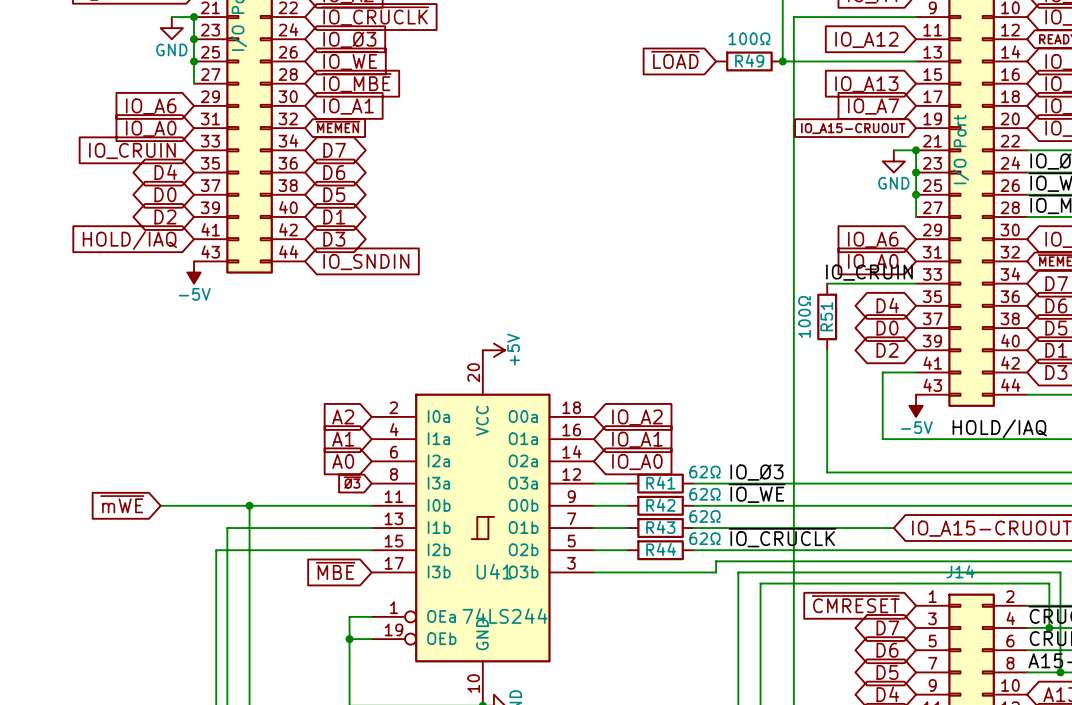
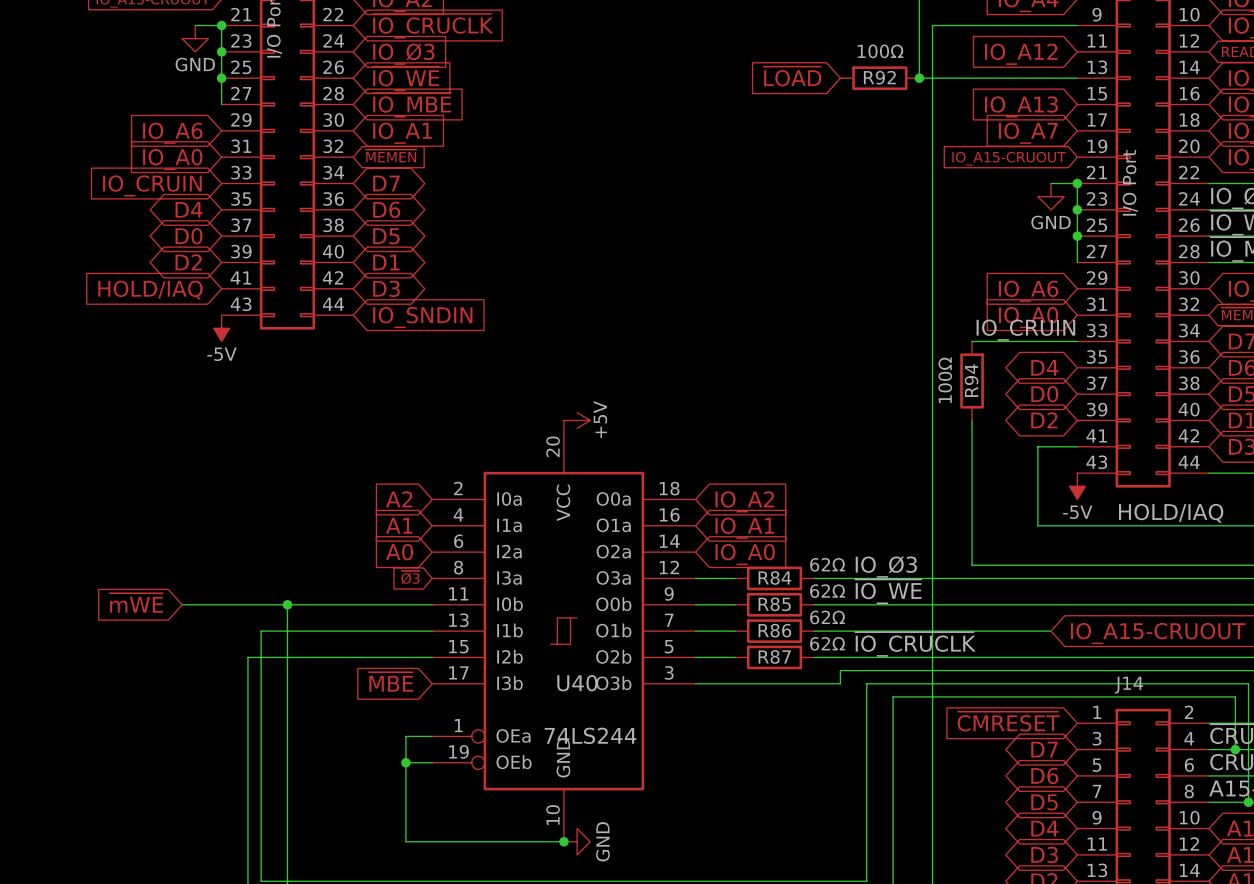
R49 name: R49 (749, 60) -> R92 (879, 77)
R51 name: R51 (826, 316) -> R94 (971, 380)
R41 name: R41 (660, 482) -> R84 (774, 577)
R42 name: R42 (660, 505) -> R85 (774, 604)
R43 name: R43 (660, 527) -> R86 (774, 630)
R44 name: R44 (661, 549) -> R87 (774, 656)
U41 name: U41 (494, 571) -> U40 (577, 683)

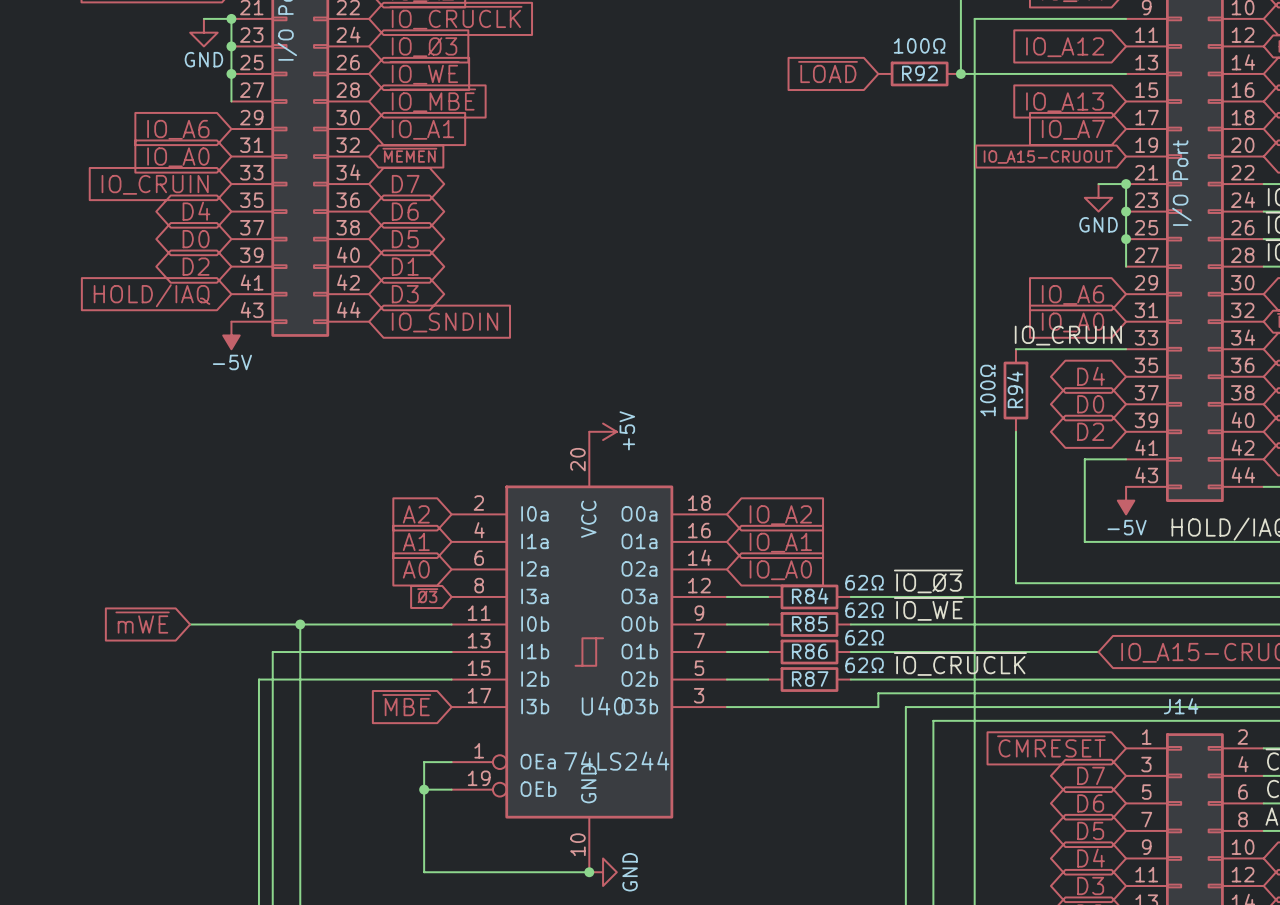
label: IO_Ø3 (886, 566) -> ~{IO_Ø3} (928, 581)

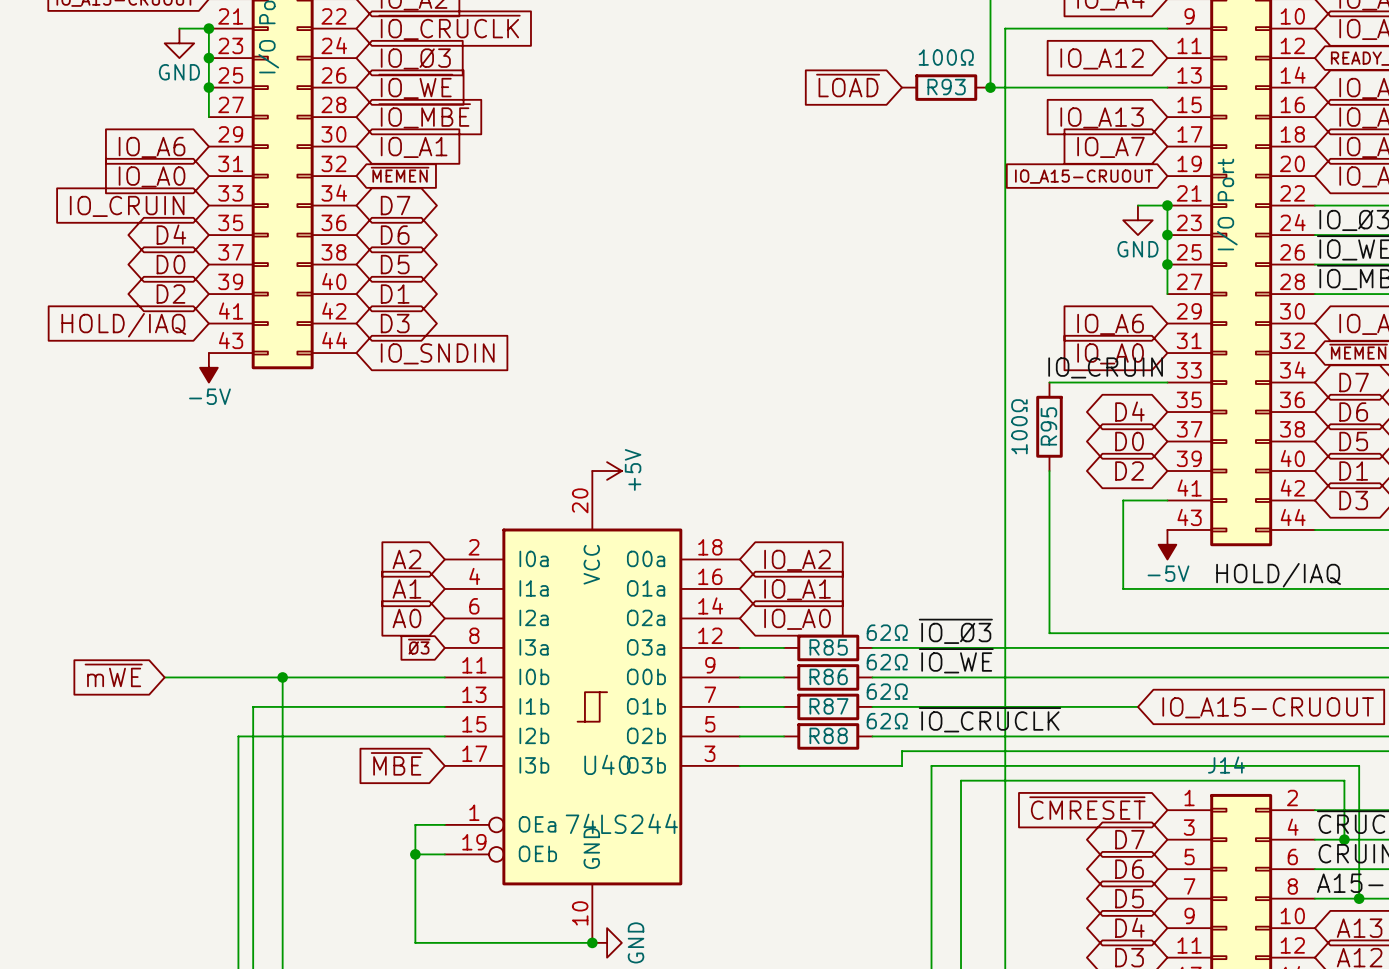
R92 name: R92 (919, 73) -> R93 (946, 87)
R94 name: R94 (1015, 389) -> R95 (1048, 426)
R84 name: R84 (810, 596) -> R85 (828, 647)
R85 name: R85 (809, 623) -> R86 (828, 676)
R86 name: R86 (809, 651) -> R87 (828, 706)
R87 name: R87 (810, 679) -> R88 (828, 735)

